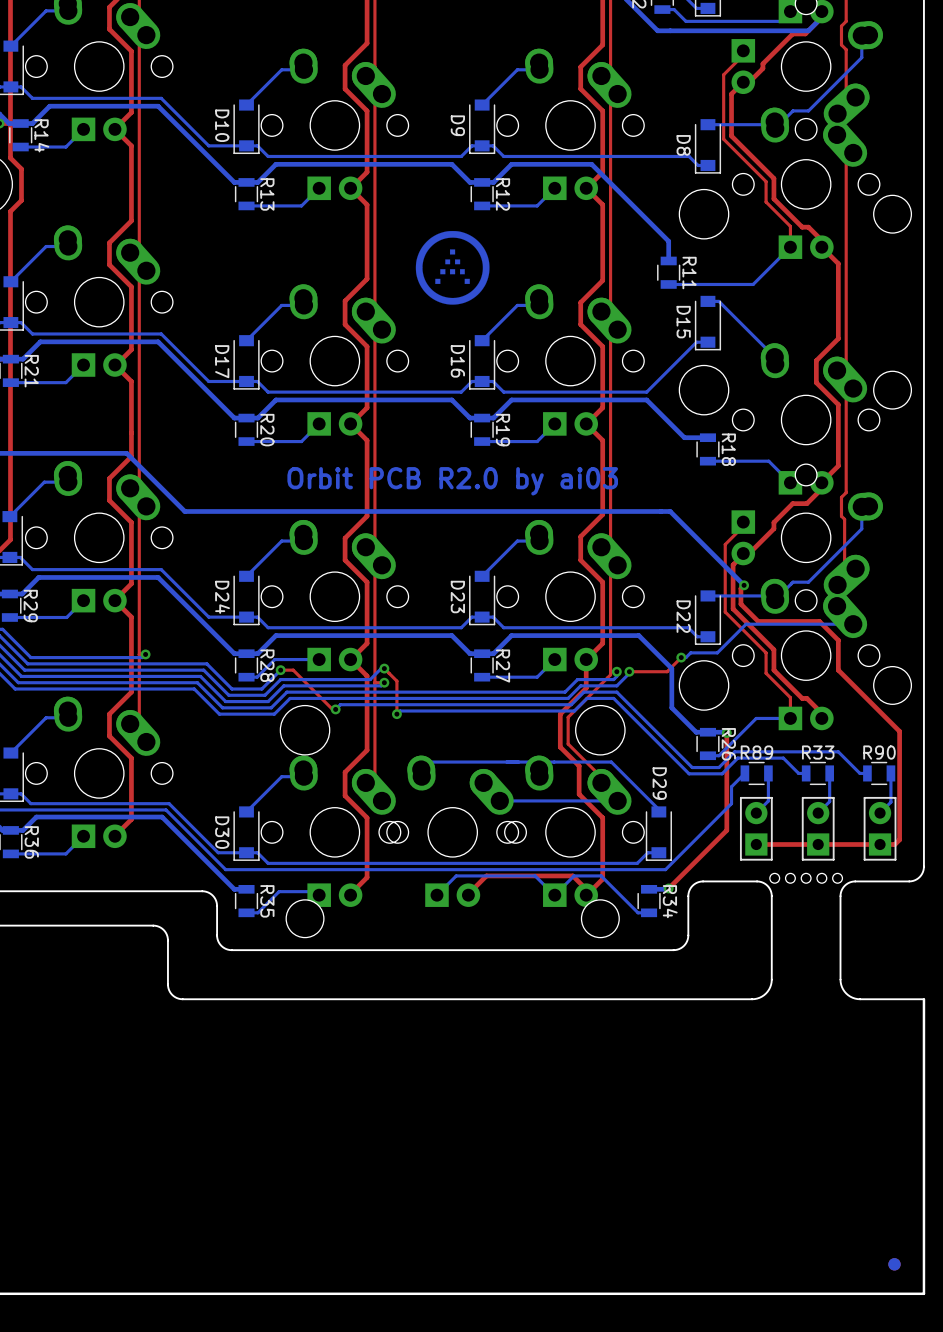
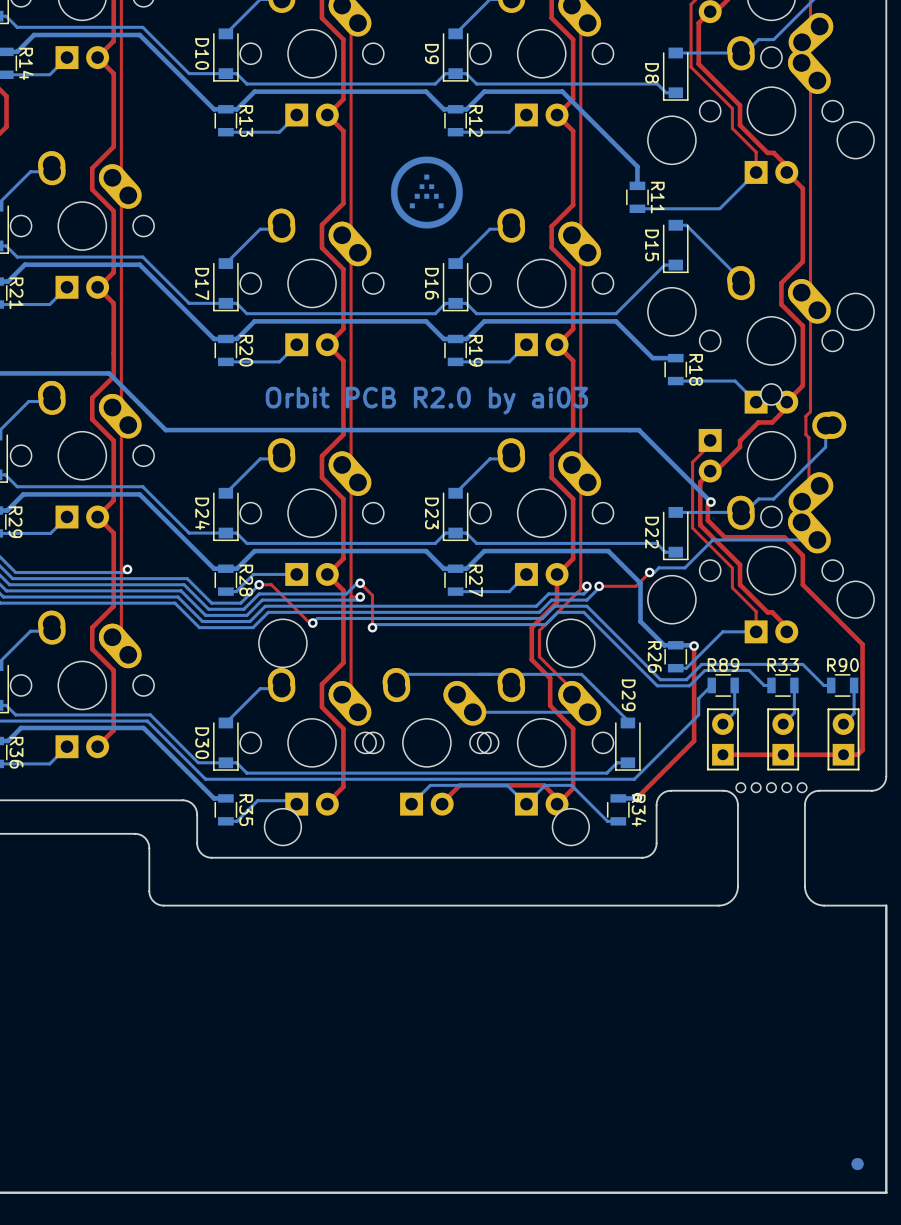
R26 name position: R26 (728, 744) -> R26 (654, 657)

